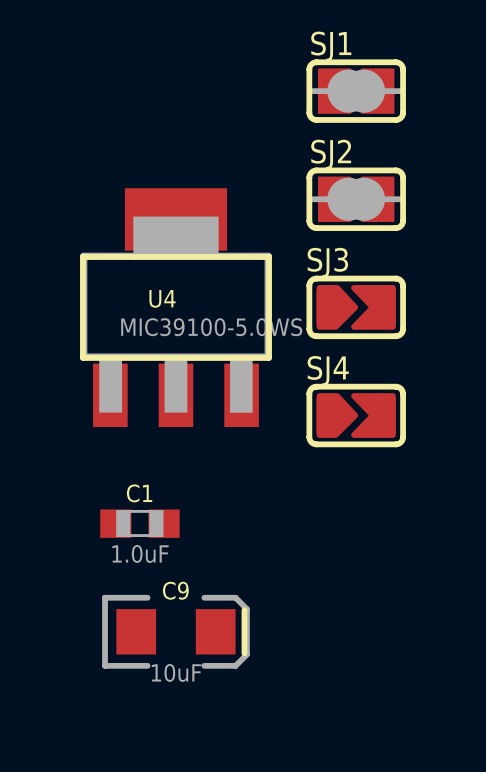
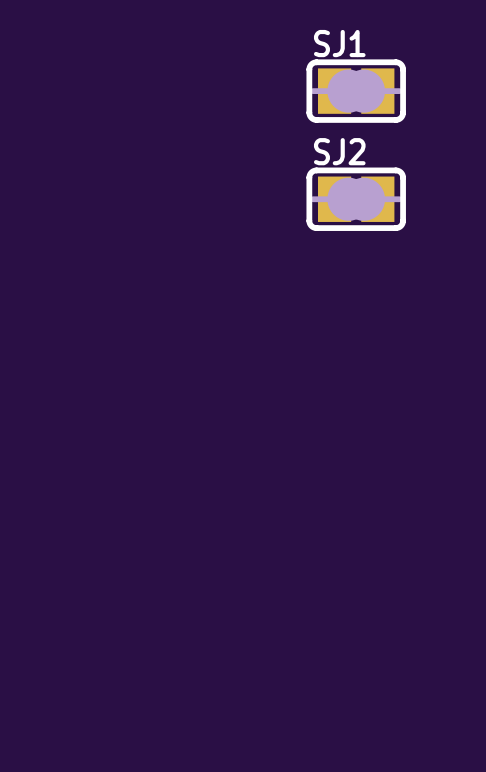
U4: MIC39100-5.0WS (175, 307) -> none
SJ3: (356, 307) -> none
SJ4: (356, 415) -> none
C1: 1.0uF (139, 523) -> none
C9: 10uF (175, 631) -> none

